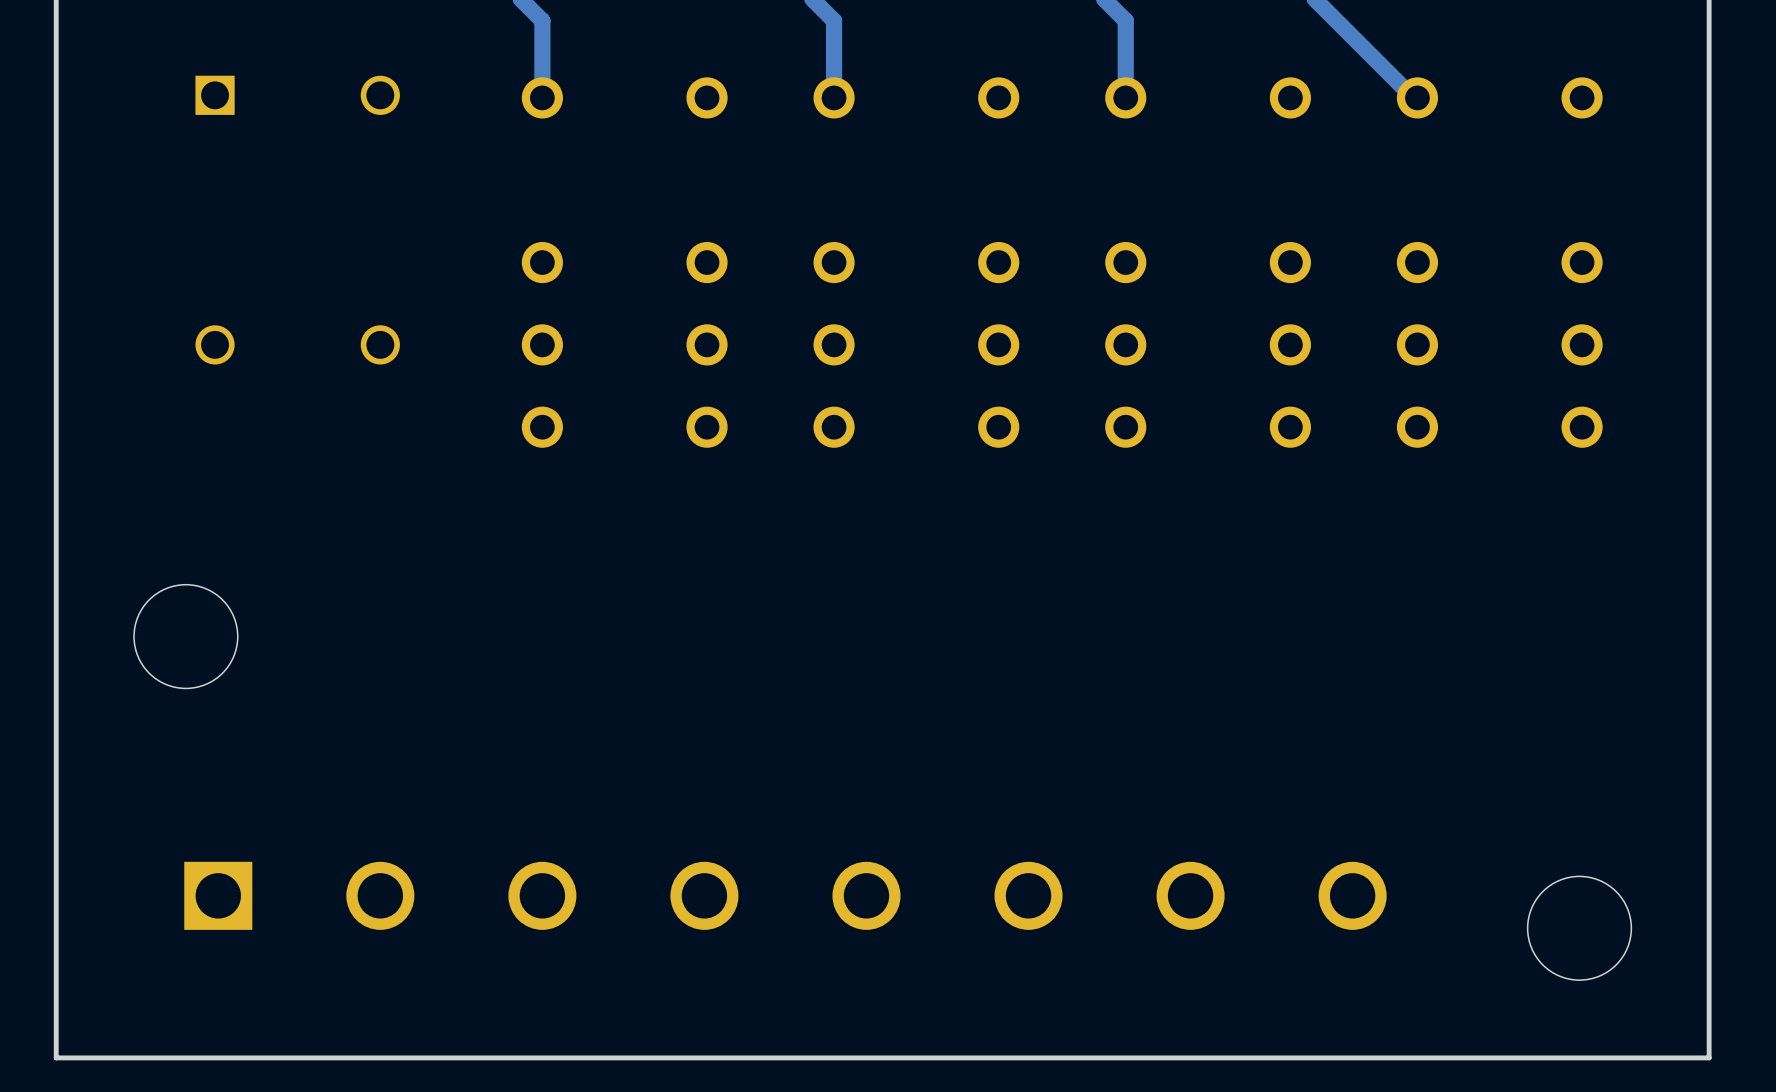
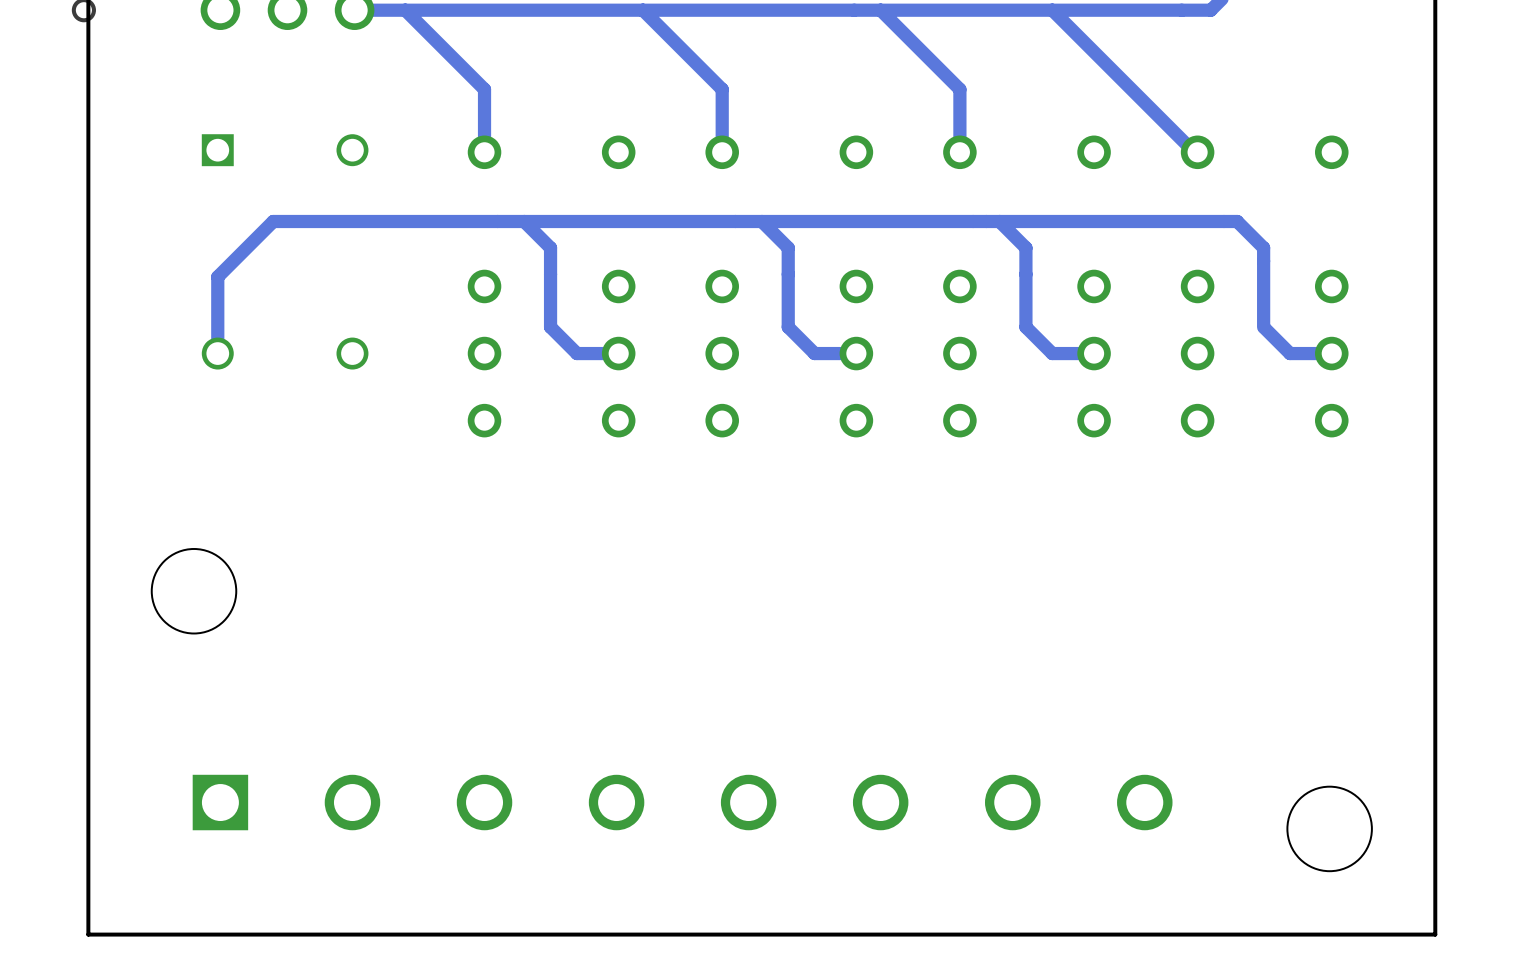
track: none -> (524, 221) (550, 247) (550, 327) (576, 353) (618, 353)
track: none -> (761, 221) (788, 247) (788, 327) (814, 353) (856, 353)
track: none -> (999, 221) (1025, 247) (1025, 327) (1052, 353) (1094, 353)
track: none -> (1263, 327) (1263, 247) (1237, 221) (273, 221) (217, 276) (217, 353)
track: none -> (1264, 328) (1290, 353) (1331, 353)

